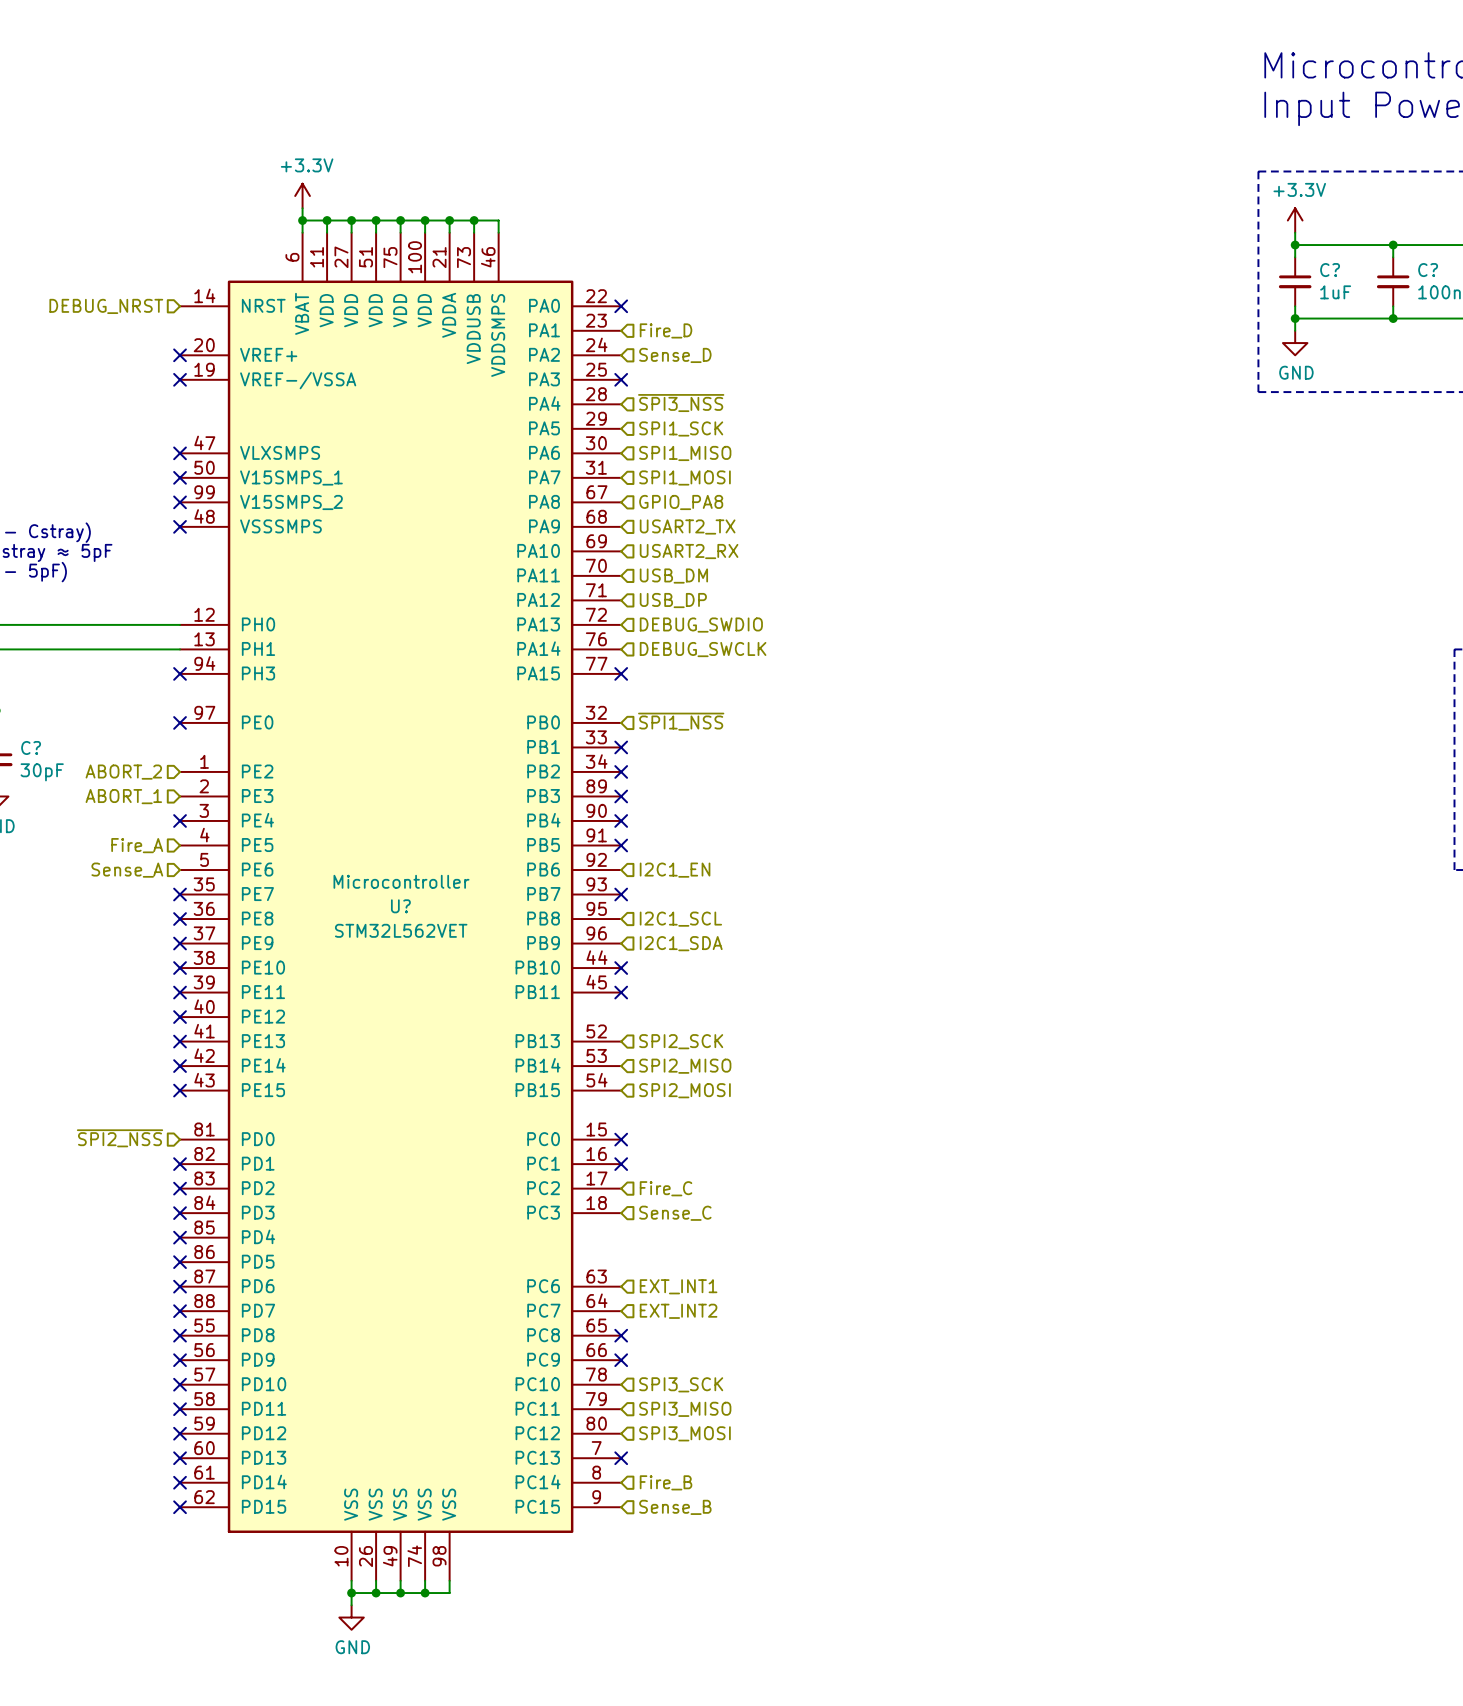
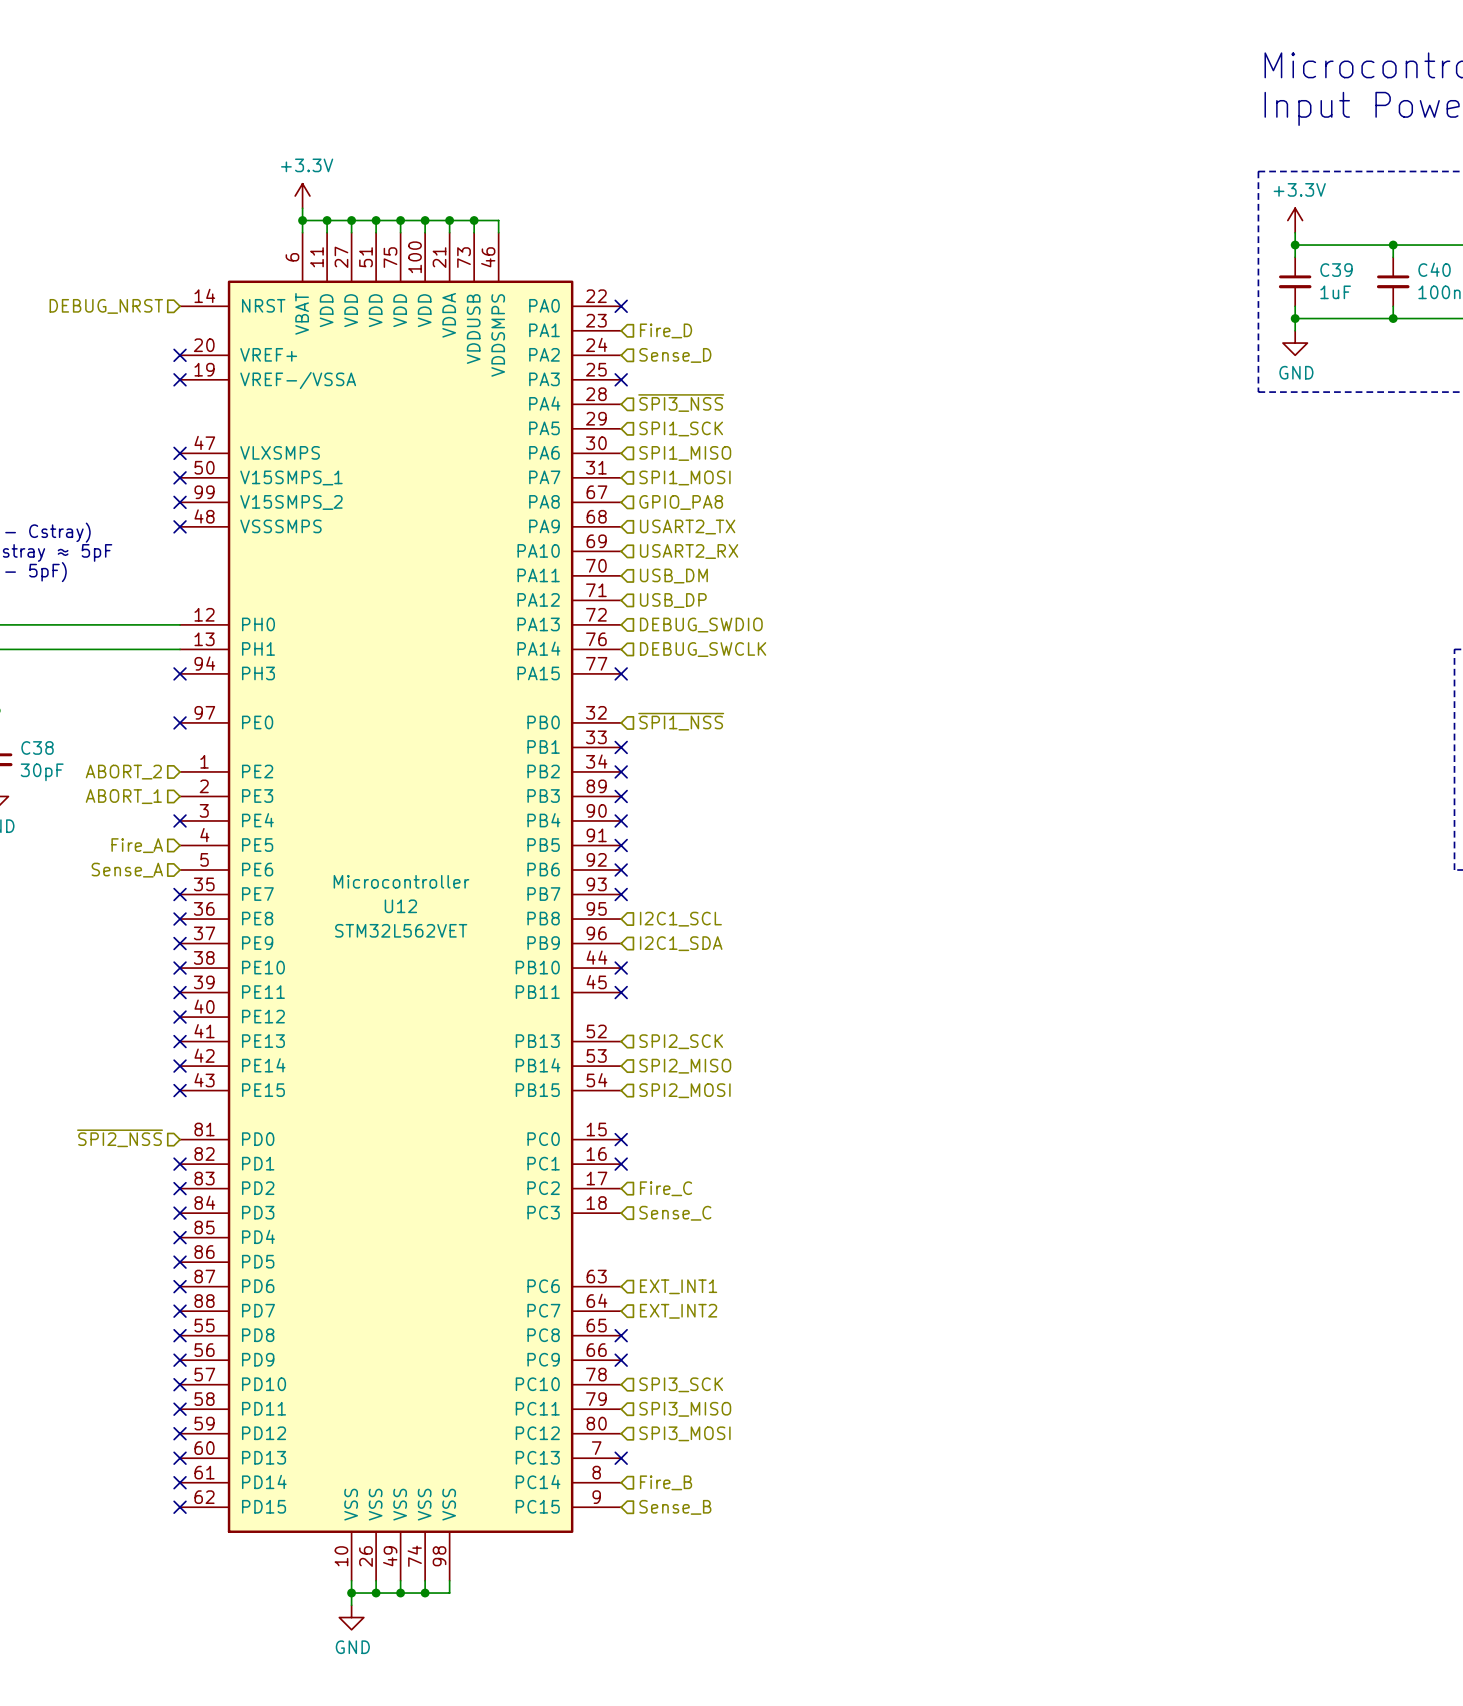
C? name: C? (1330, 270) -> C39 (1336, 270)
C? name: C? (1428, 270) -> C40 (1434, 269)
C? name: C? (31, 747) -> C38 (37, 747)
no-connect mark: none -> (621, 870)
hierarchical label: I2C1_EN (675, 870) -> none
U? name: U? (400, 906) -> U12 (400, 906)

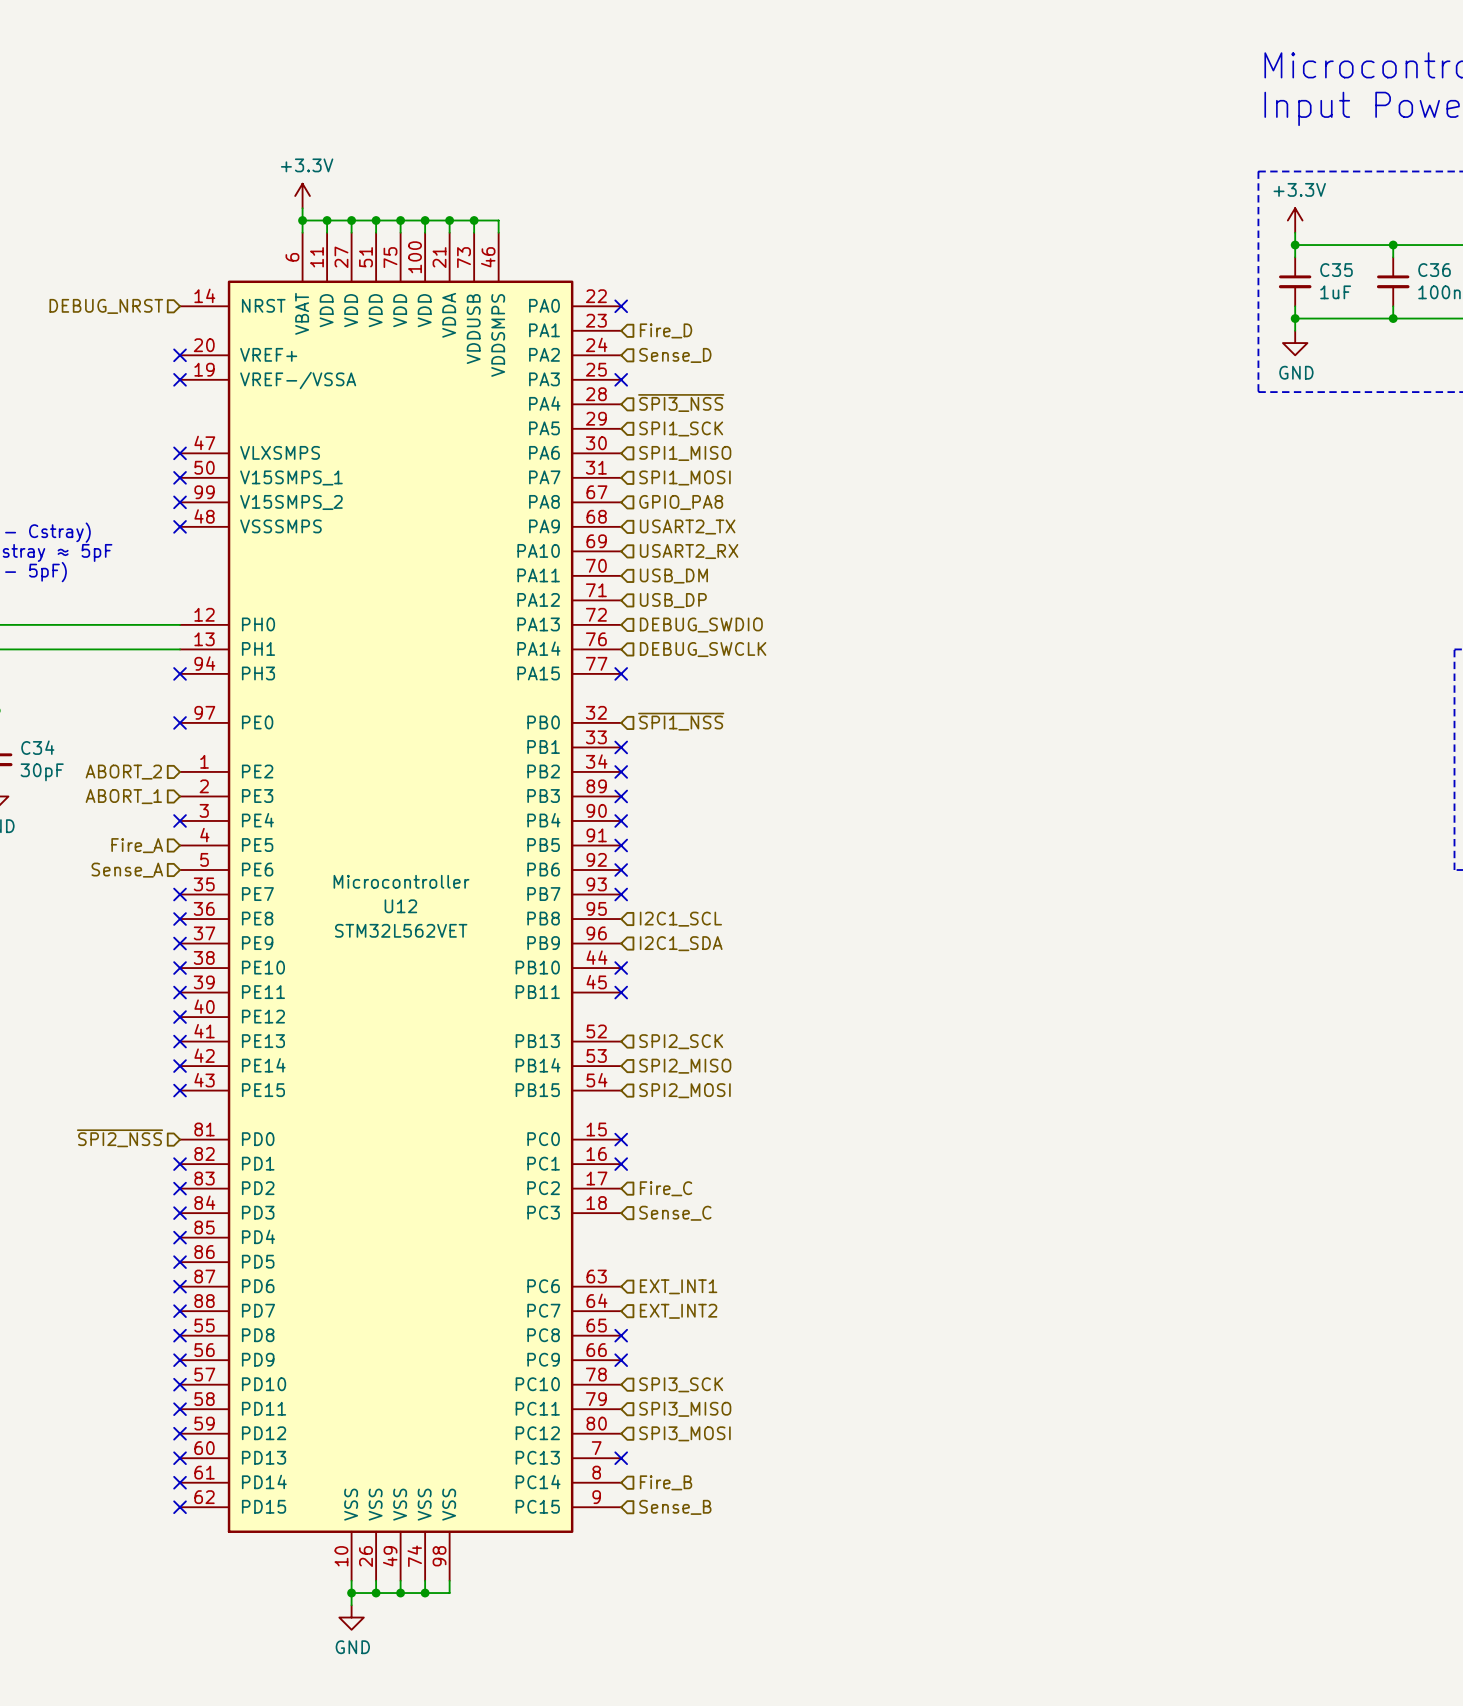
C40 name: C40 (1434, 269) -> C36 (1434, 270)
C39 name: C39 (1336, 270) -> C35 (1336, 270)
C38 name: C38 (37, 747) -> C34 (37, 747)

